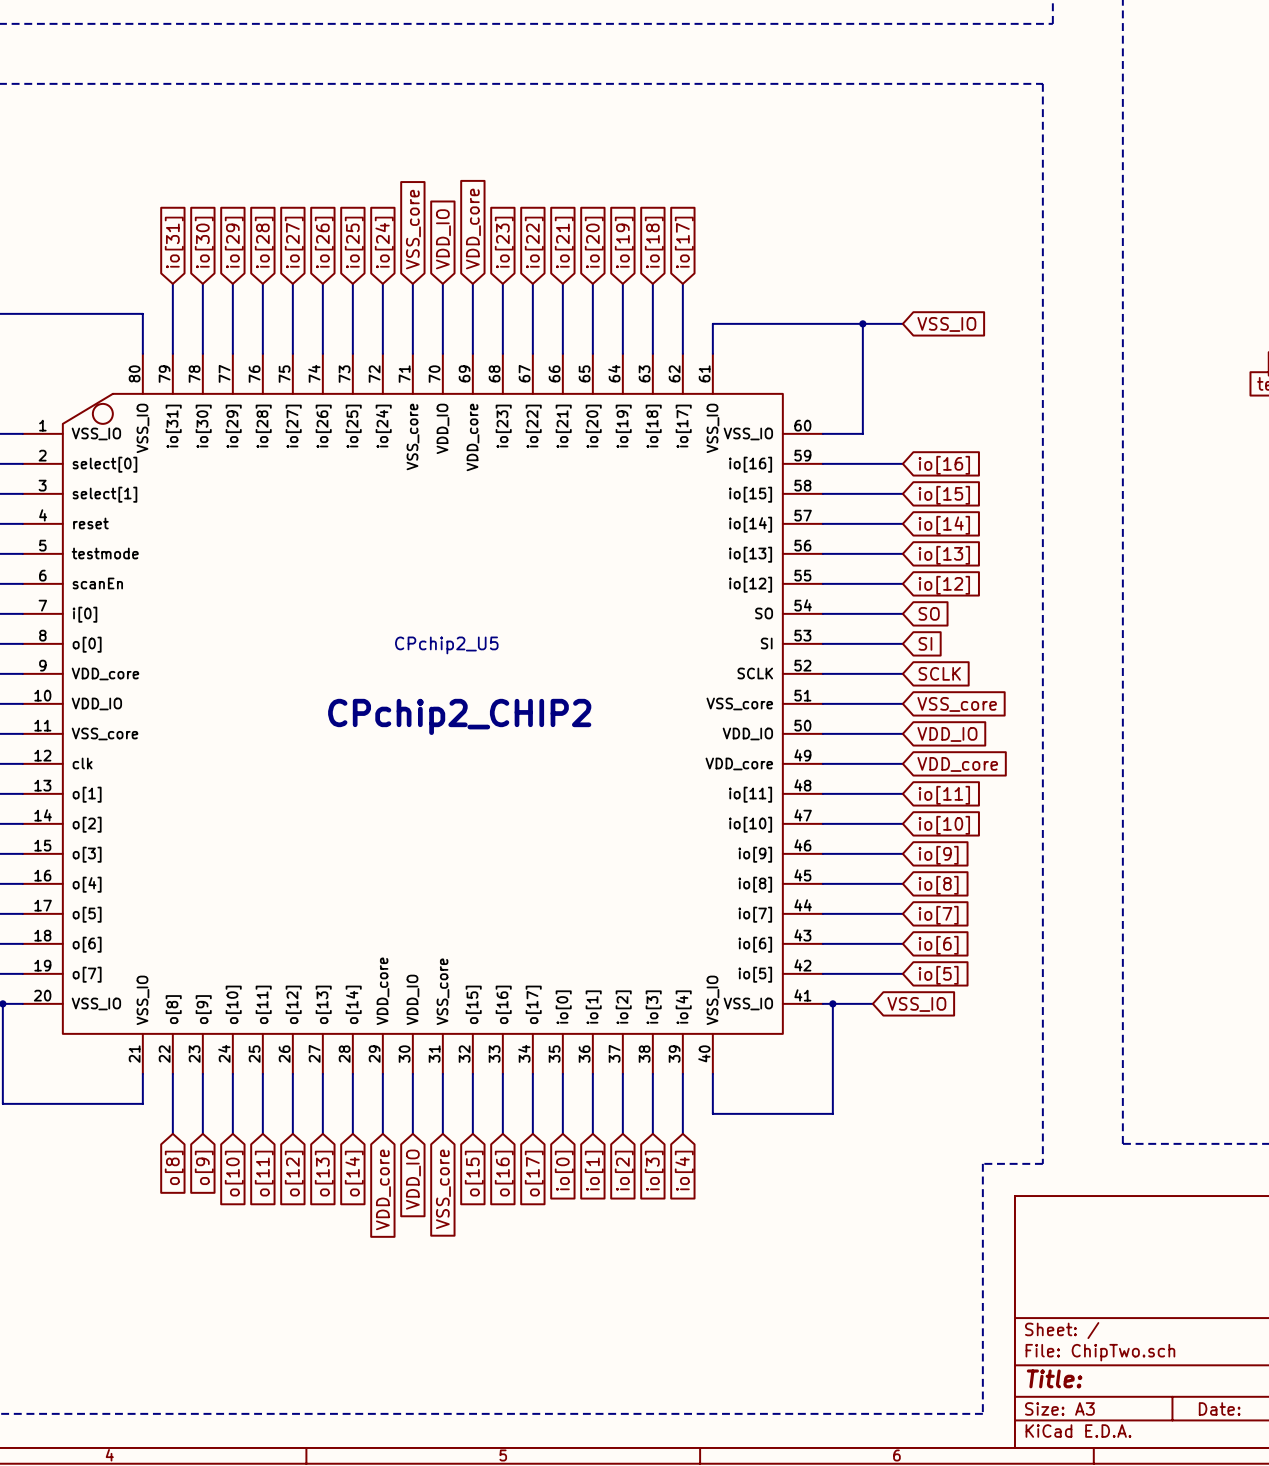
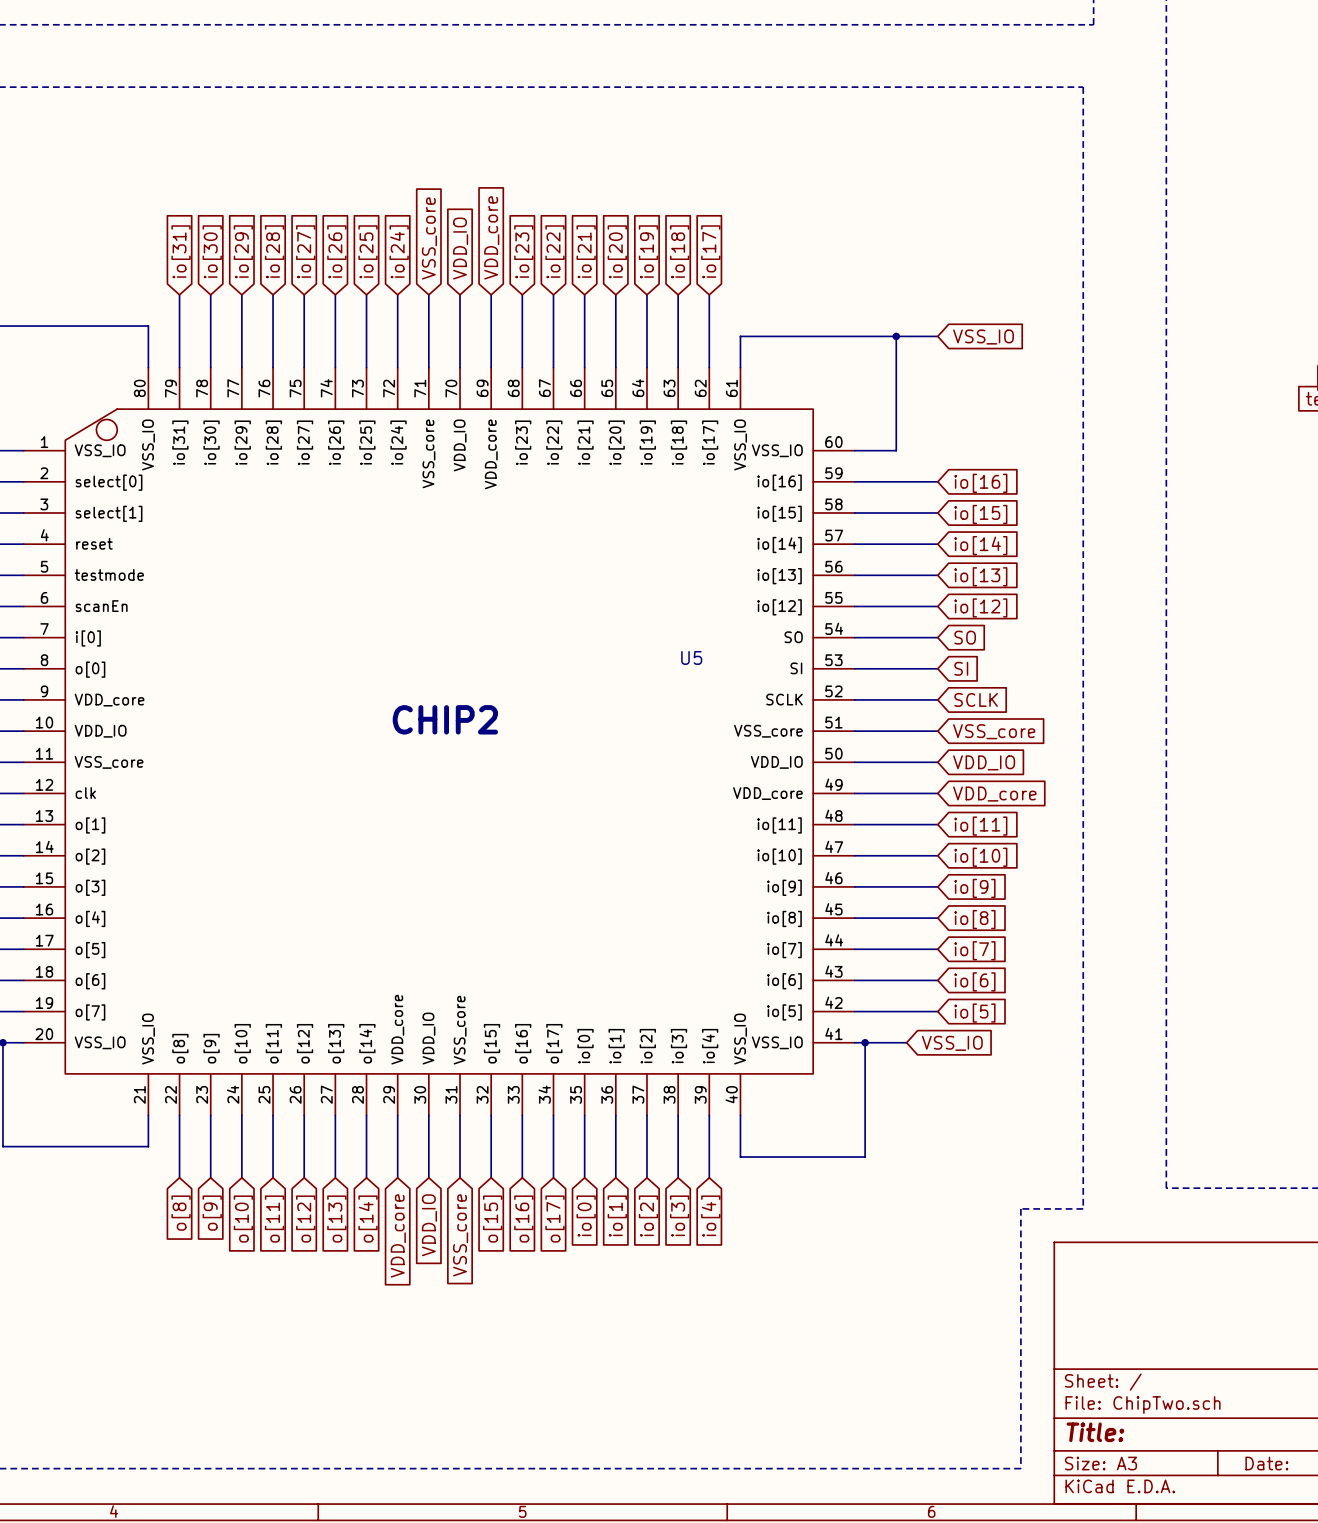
CPchip2_U5 name: CPchip2_U5 (446, 645) -> U5 (691, 657)
CPchip2_U5 value: CPchip2_CHIP2 (459, 716) -> CHIP2 (445, 719)

